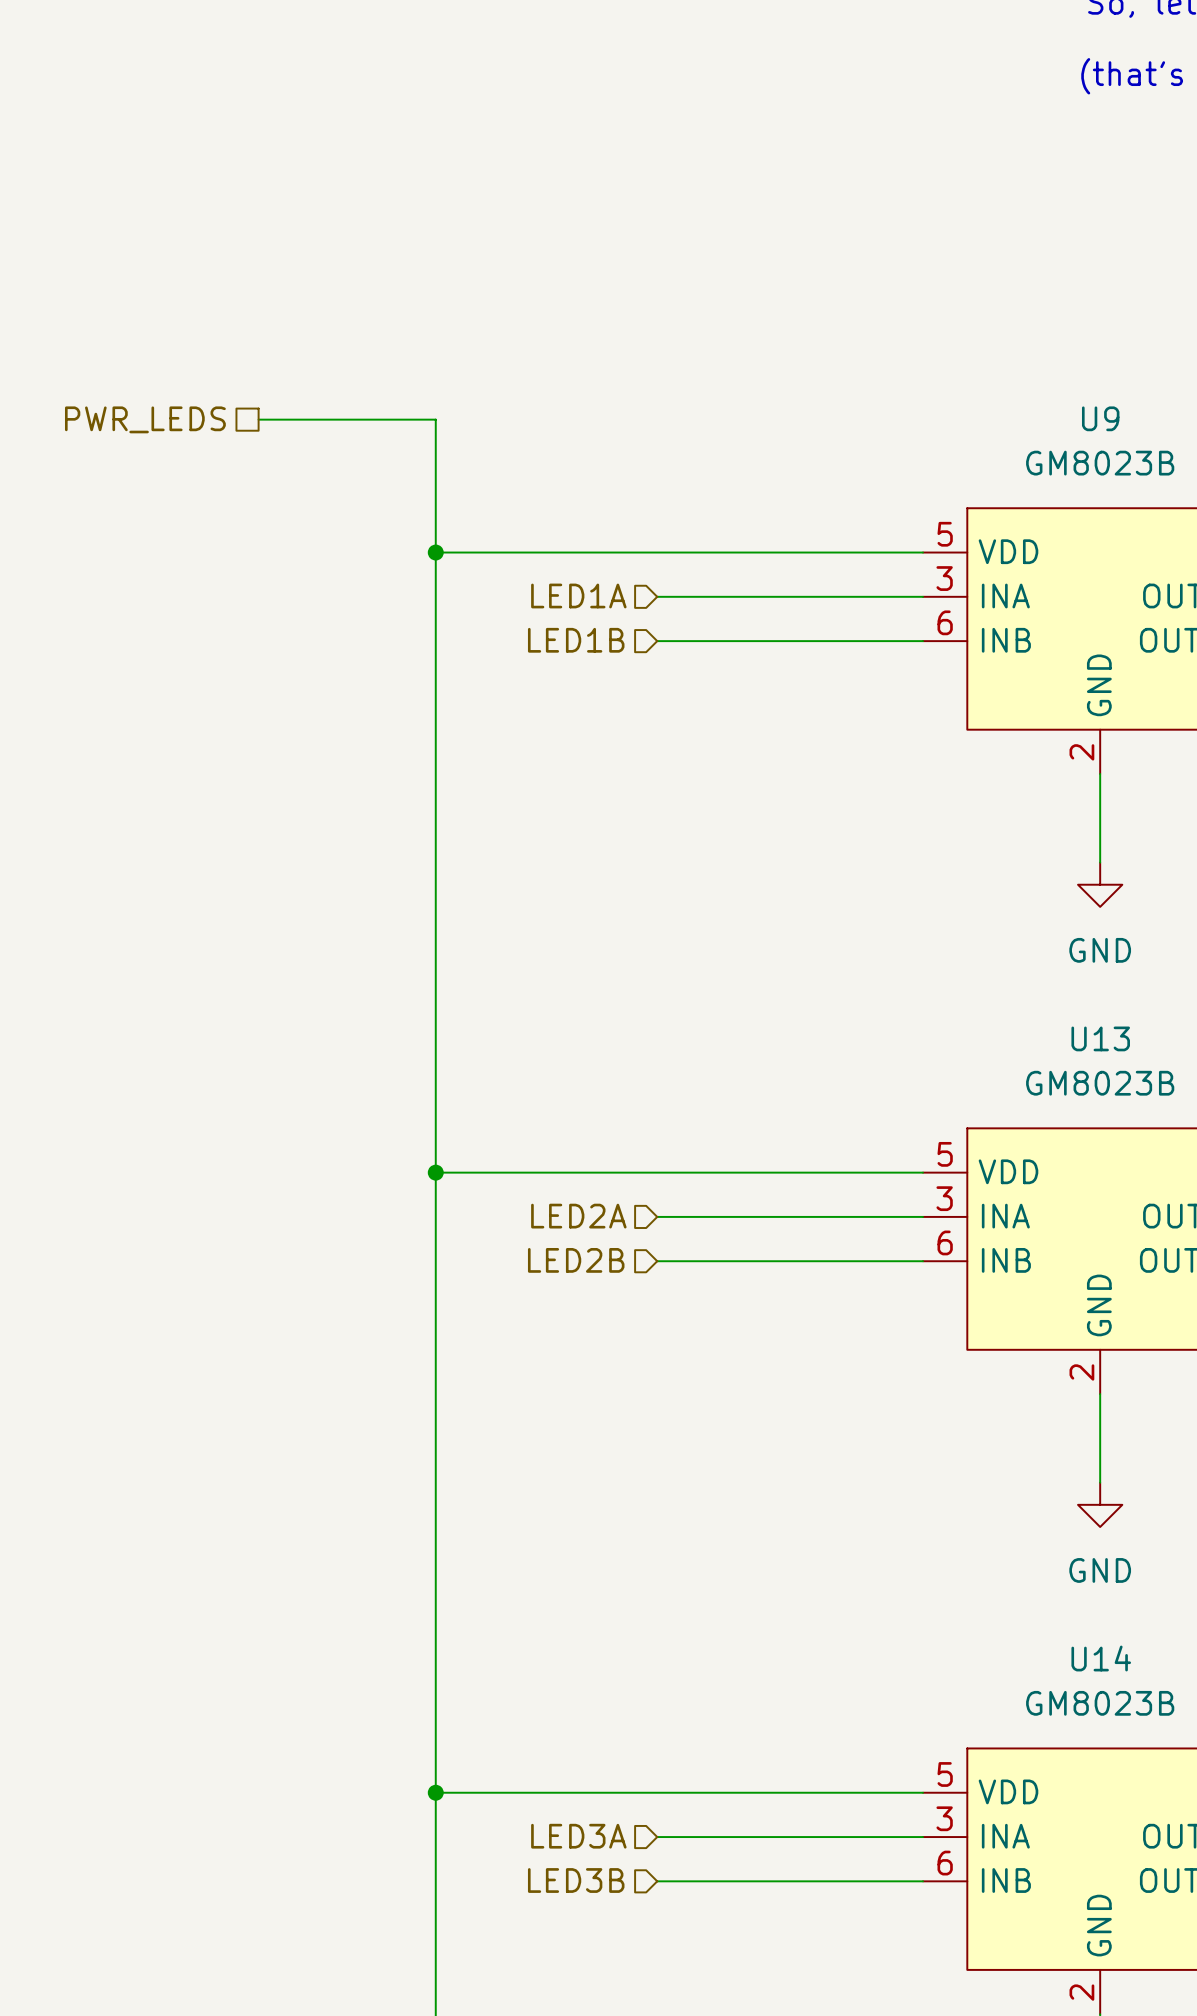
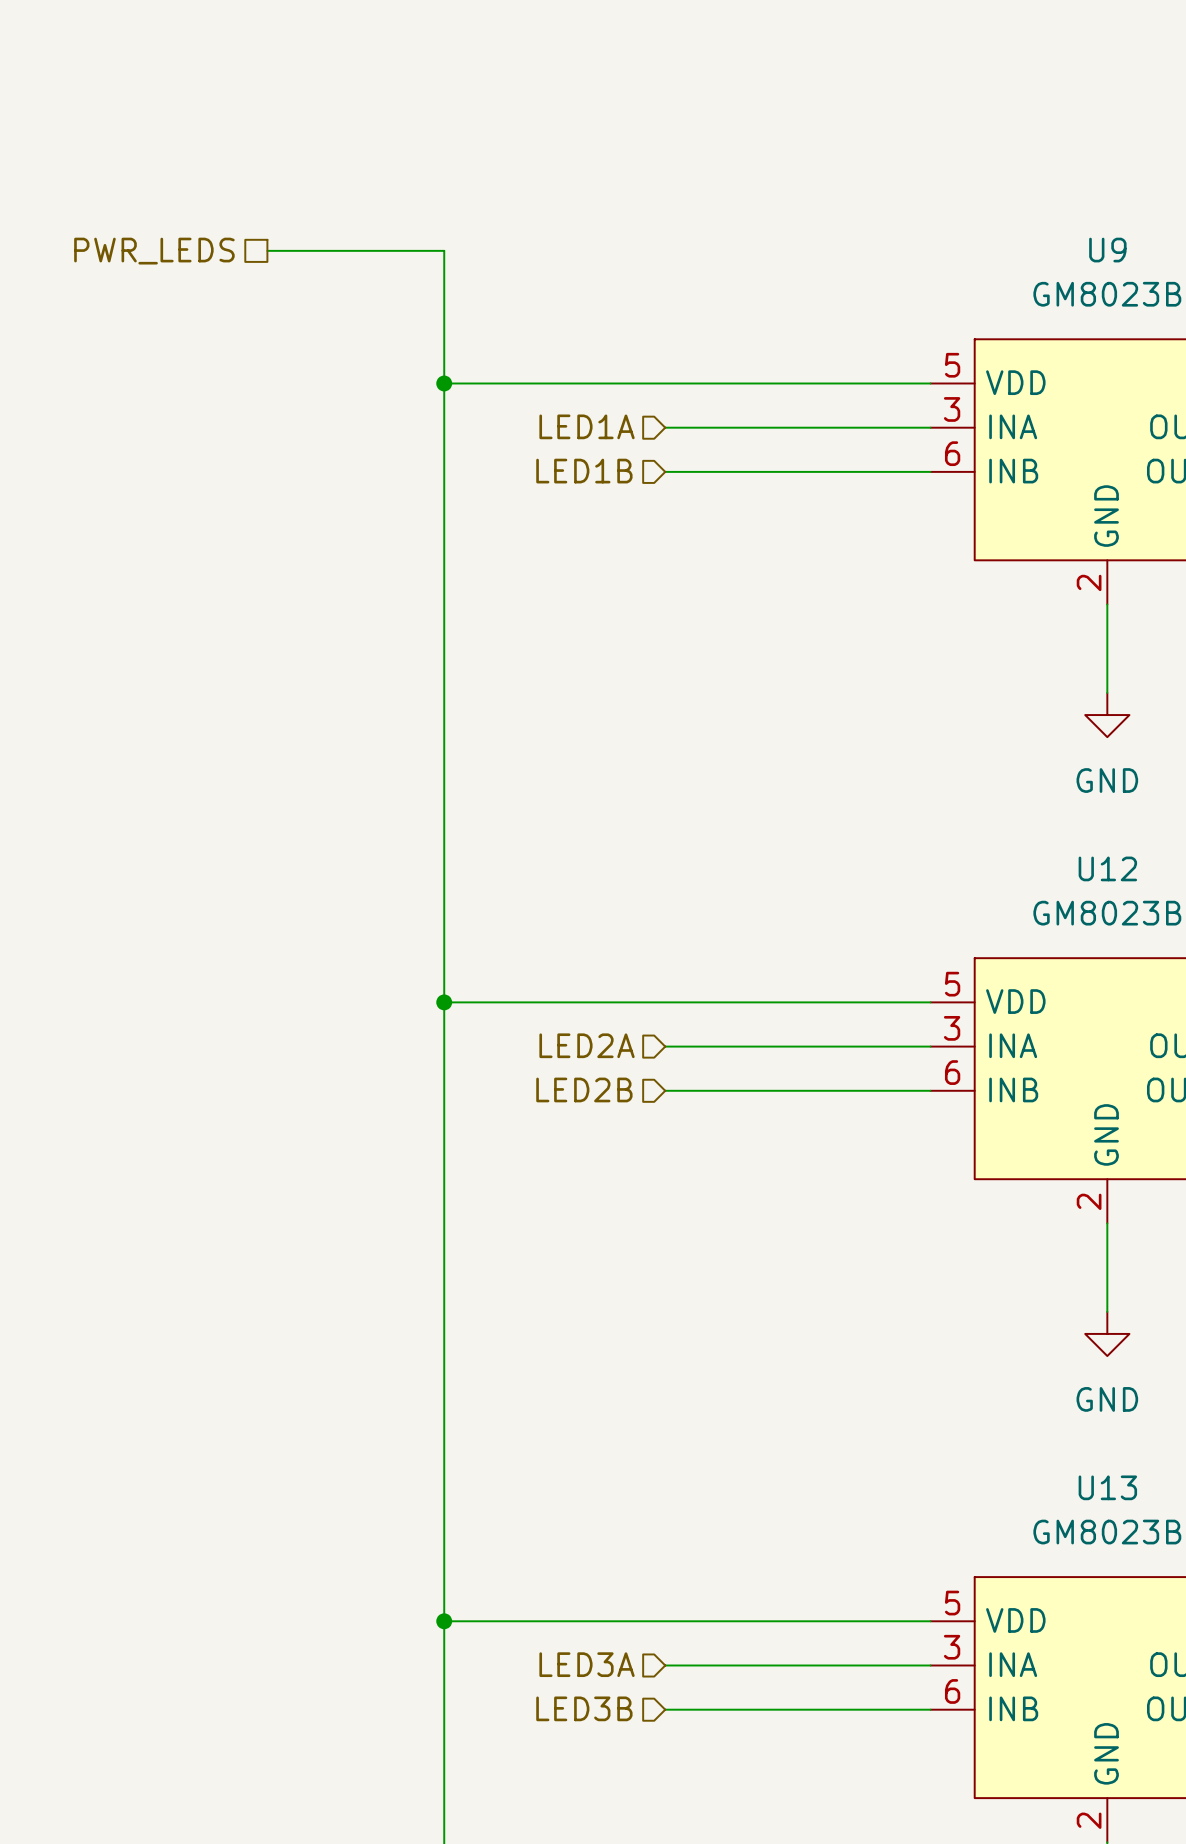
U13 name: U13 (1100, 1038) -> U12 (1107, 868)
U14 name: U14 (1101, 1658) -> U13 (1107, 1487)

